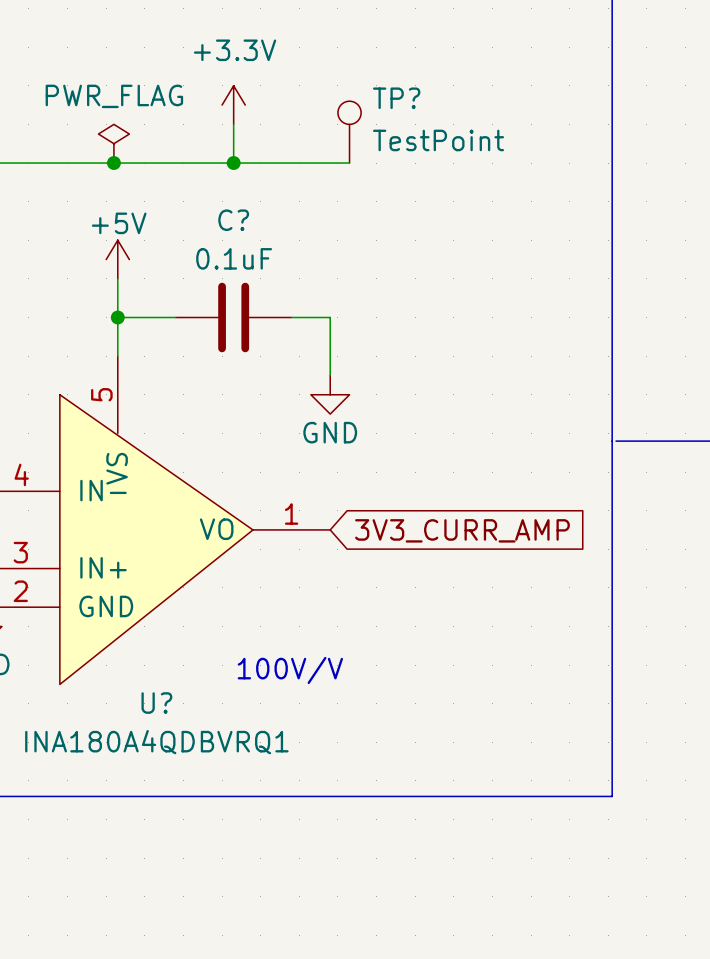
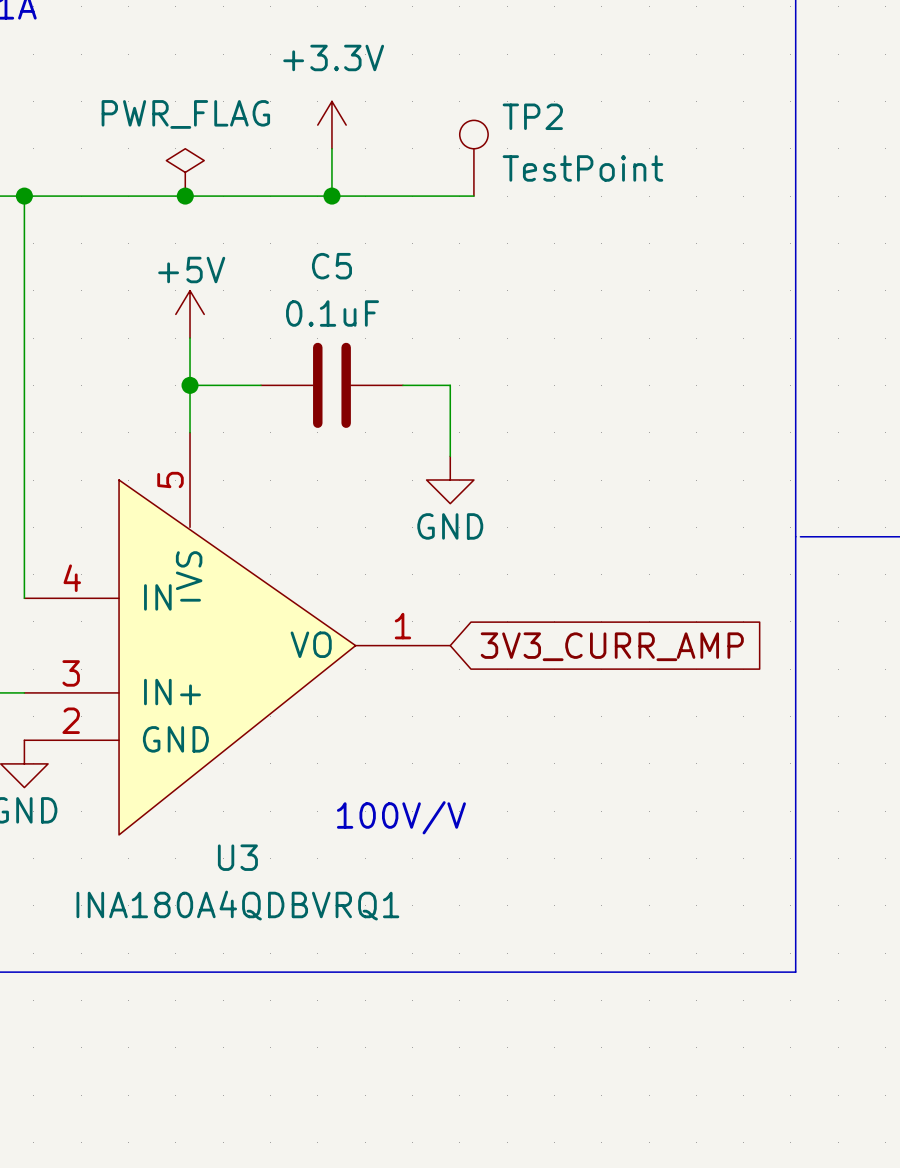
TP? name: TP? (396, 98) -> TP2 (532, 116)
C? name: C? (233, 220) -> C5 (331, 266)
U? name: U? (156, 703) -> U3 (237, 857)

